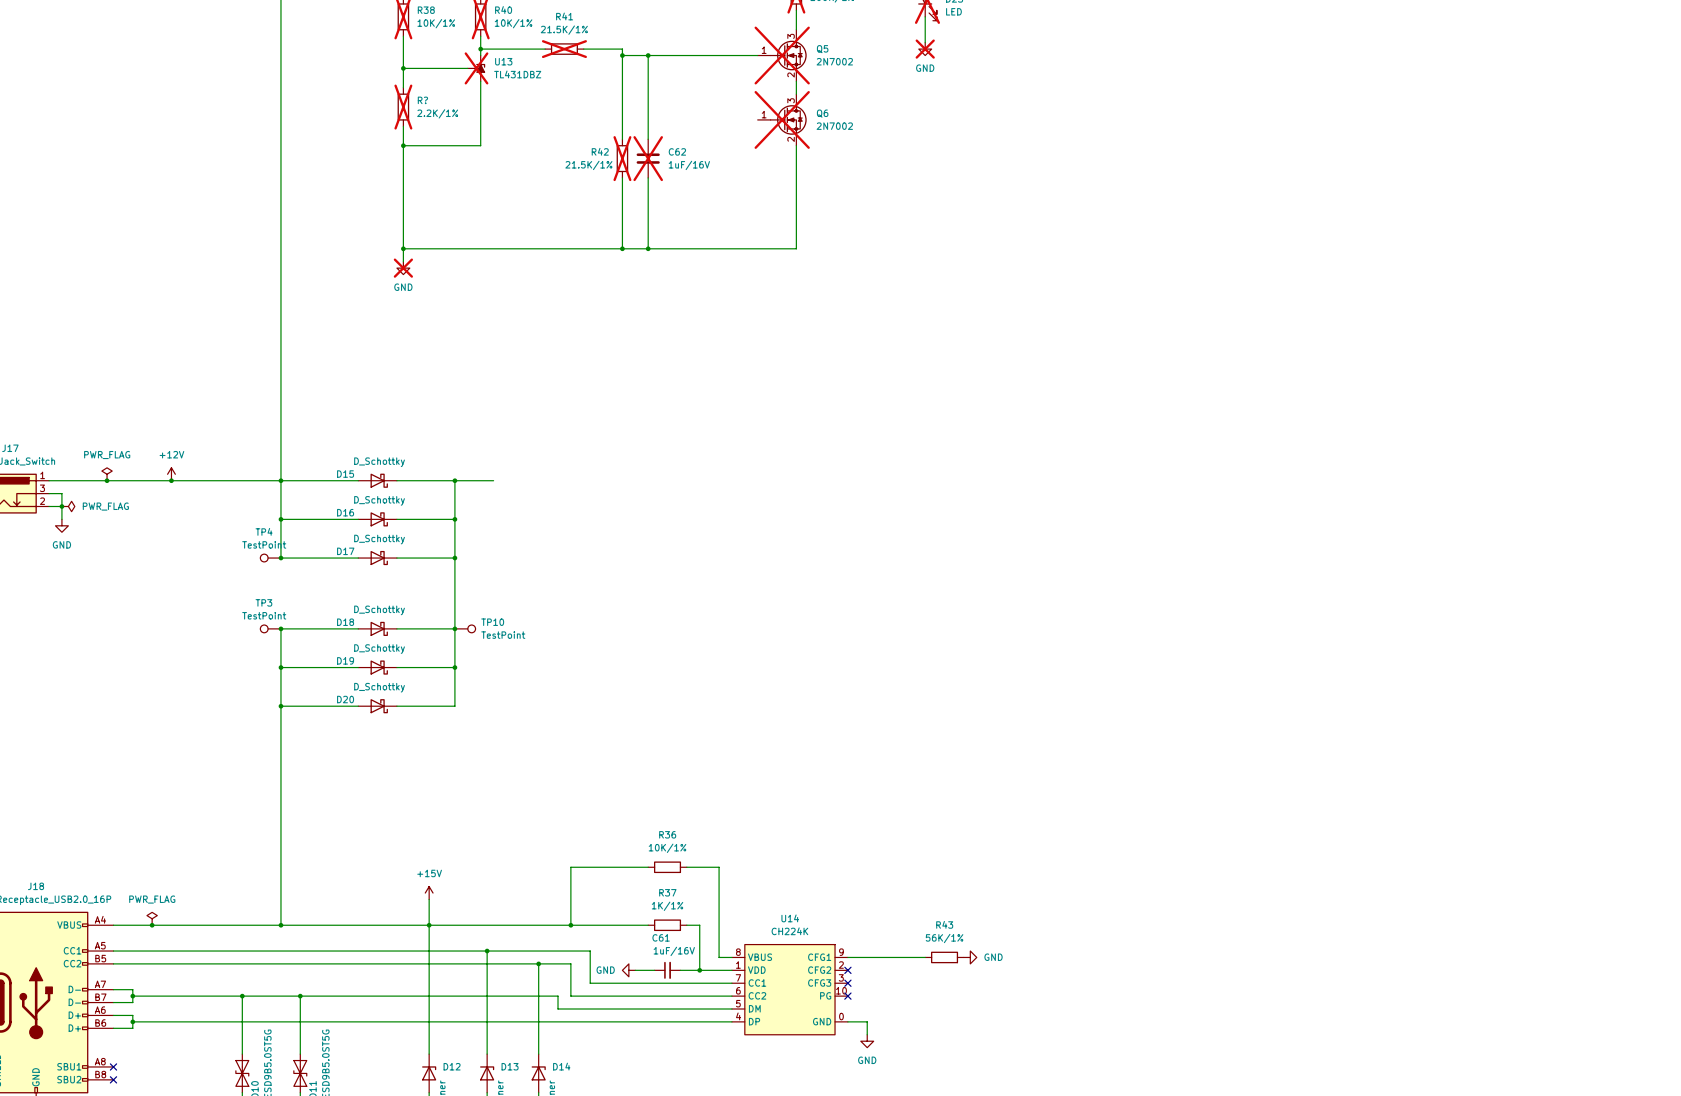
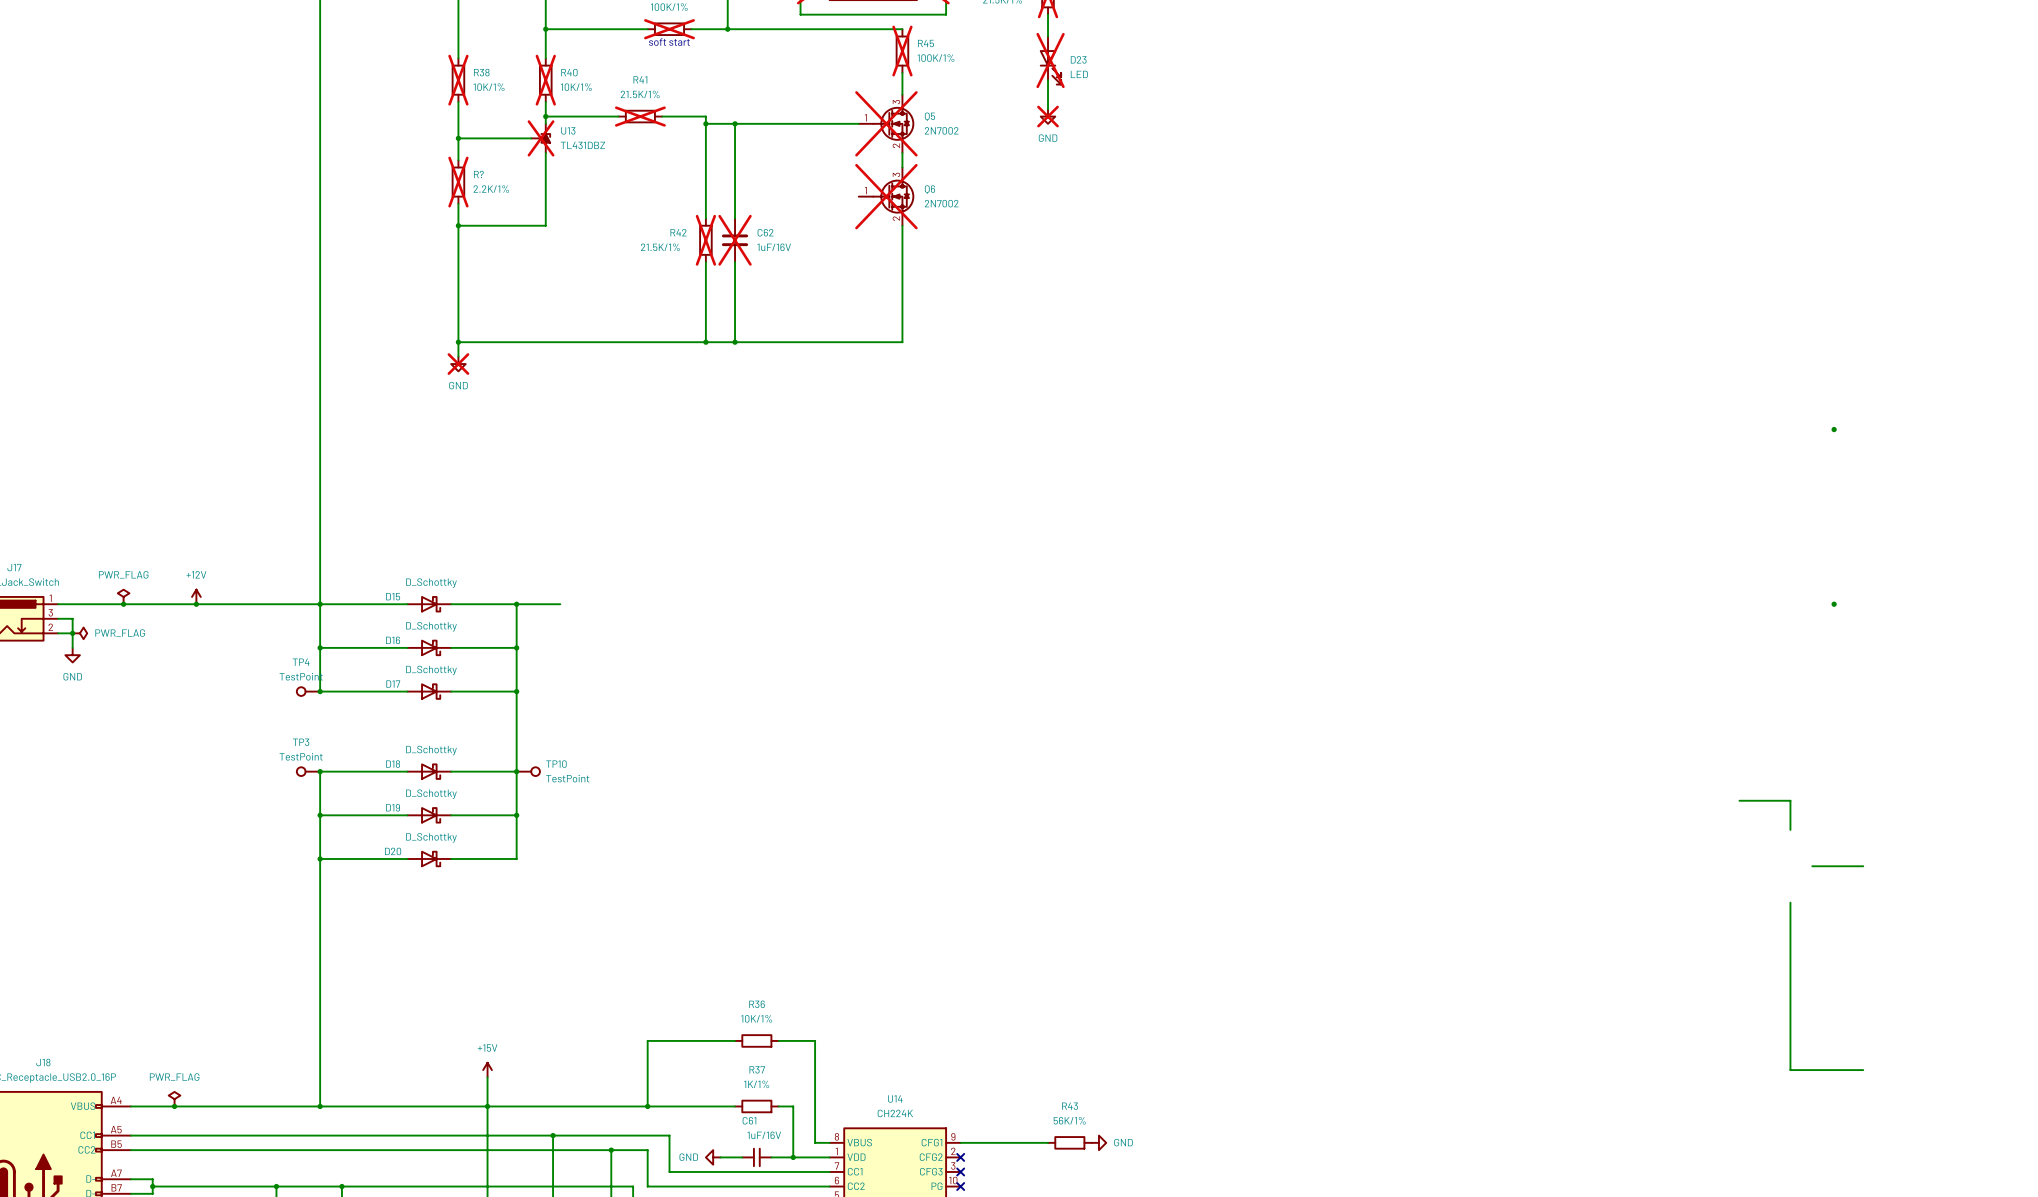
junction: none -> (1834, 429)
junction: none -> (1834, 604)
wire: none -> (1739, 800) (1790, 800) (1790, 829)
wire: none -> (1812, 866) (1863, 866)
wire: none -> (1790, 902) (1790, 1070) (1863, 1070)

